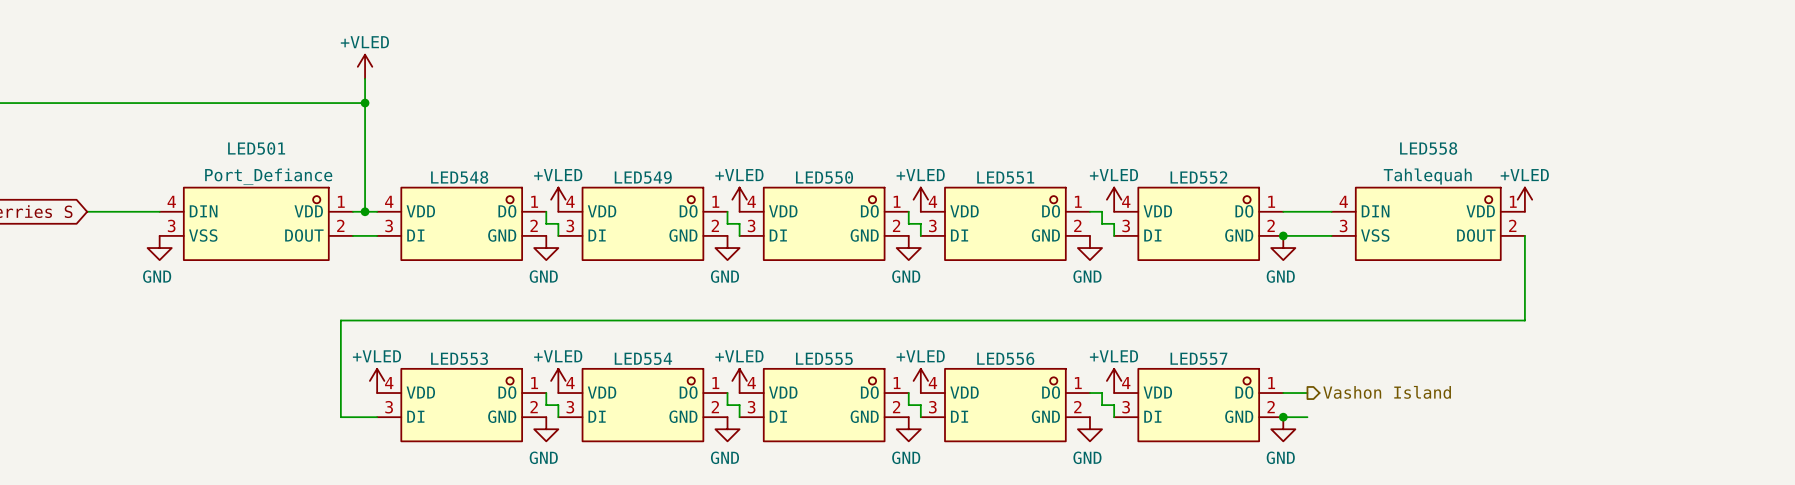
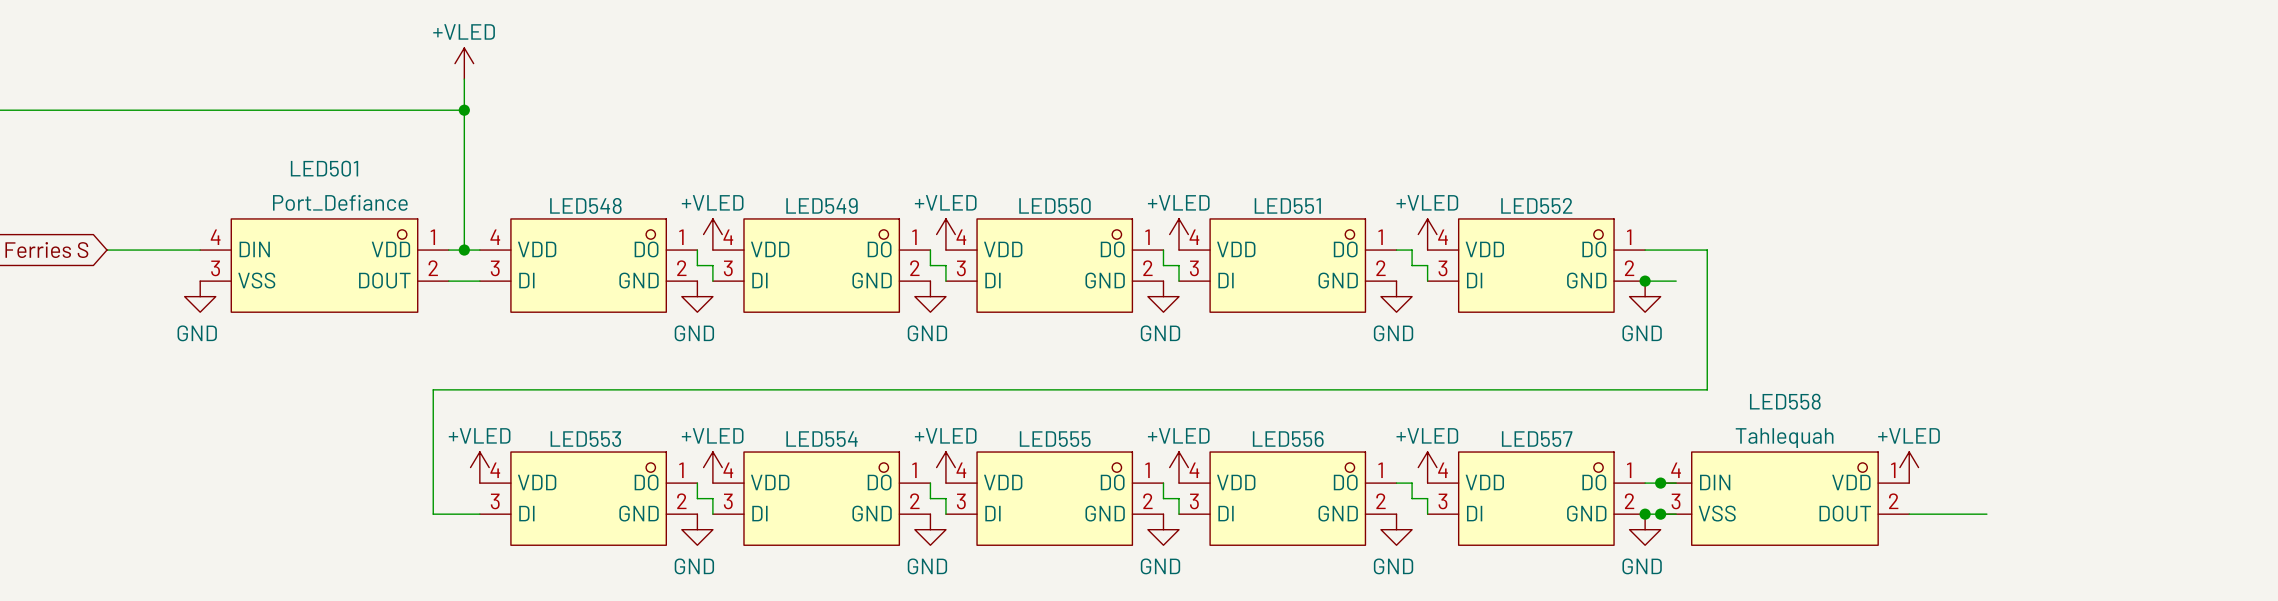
power symbol position: +VLED (1524, 199) -> +VLED (1909, 467)
LED558 position: (1428, 223) -> (1784, 498)
wire: (1307, 235) (1331, 235) -> none
wire: (1524, 235) (1524, 320) (1331, 320) -> (1707, 250) (1707, 389)
hierarchical label: Vashon Island (1387, 392) -> none
junction: none -> (1660, 483)
junction: none -> (1660, 514)
wire: none -> (1909, 514) (1986, 514)

